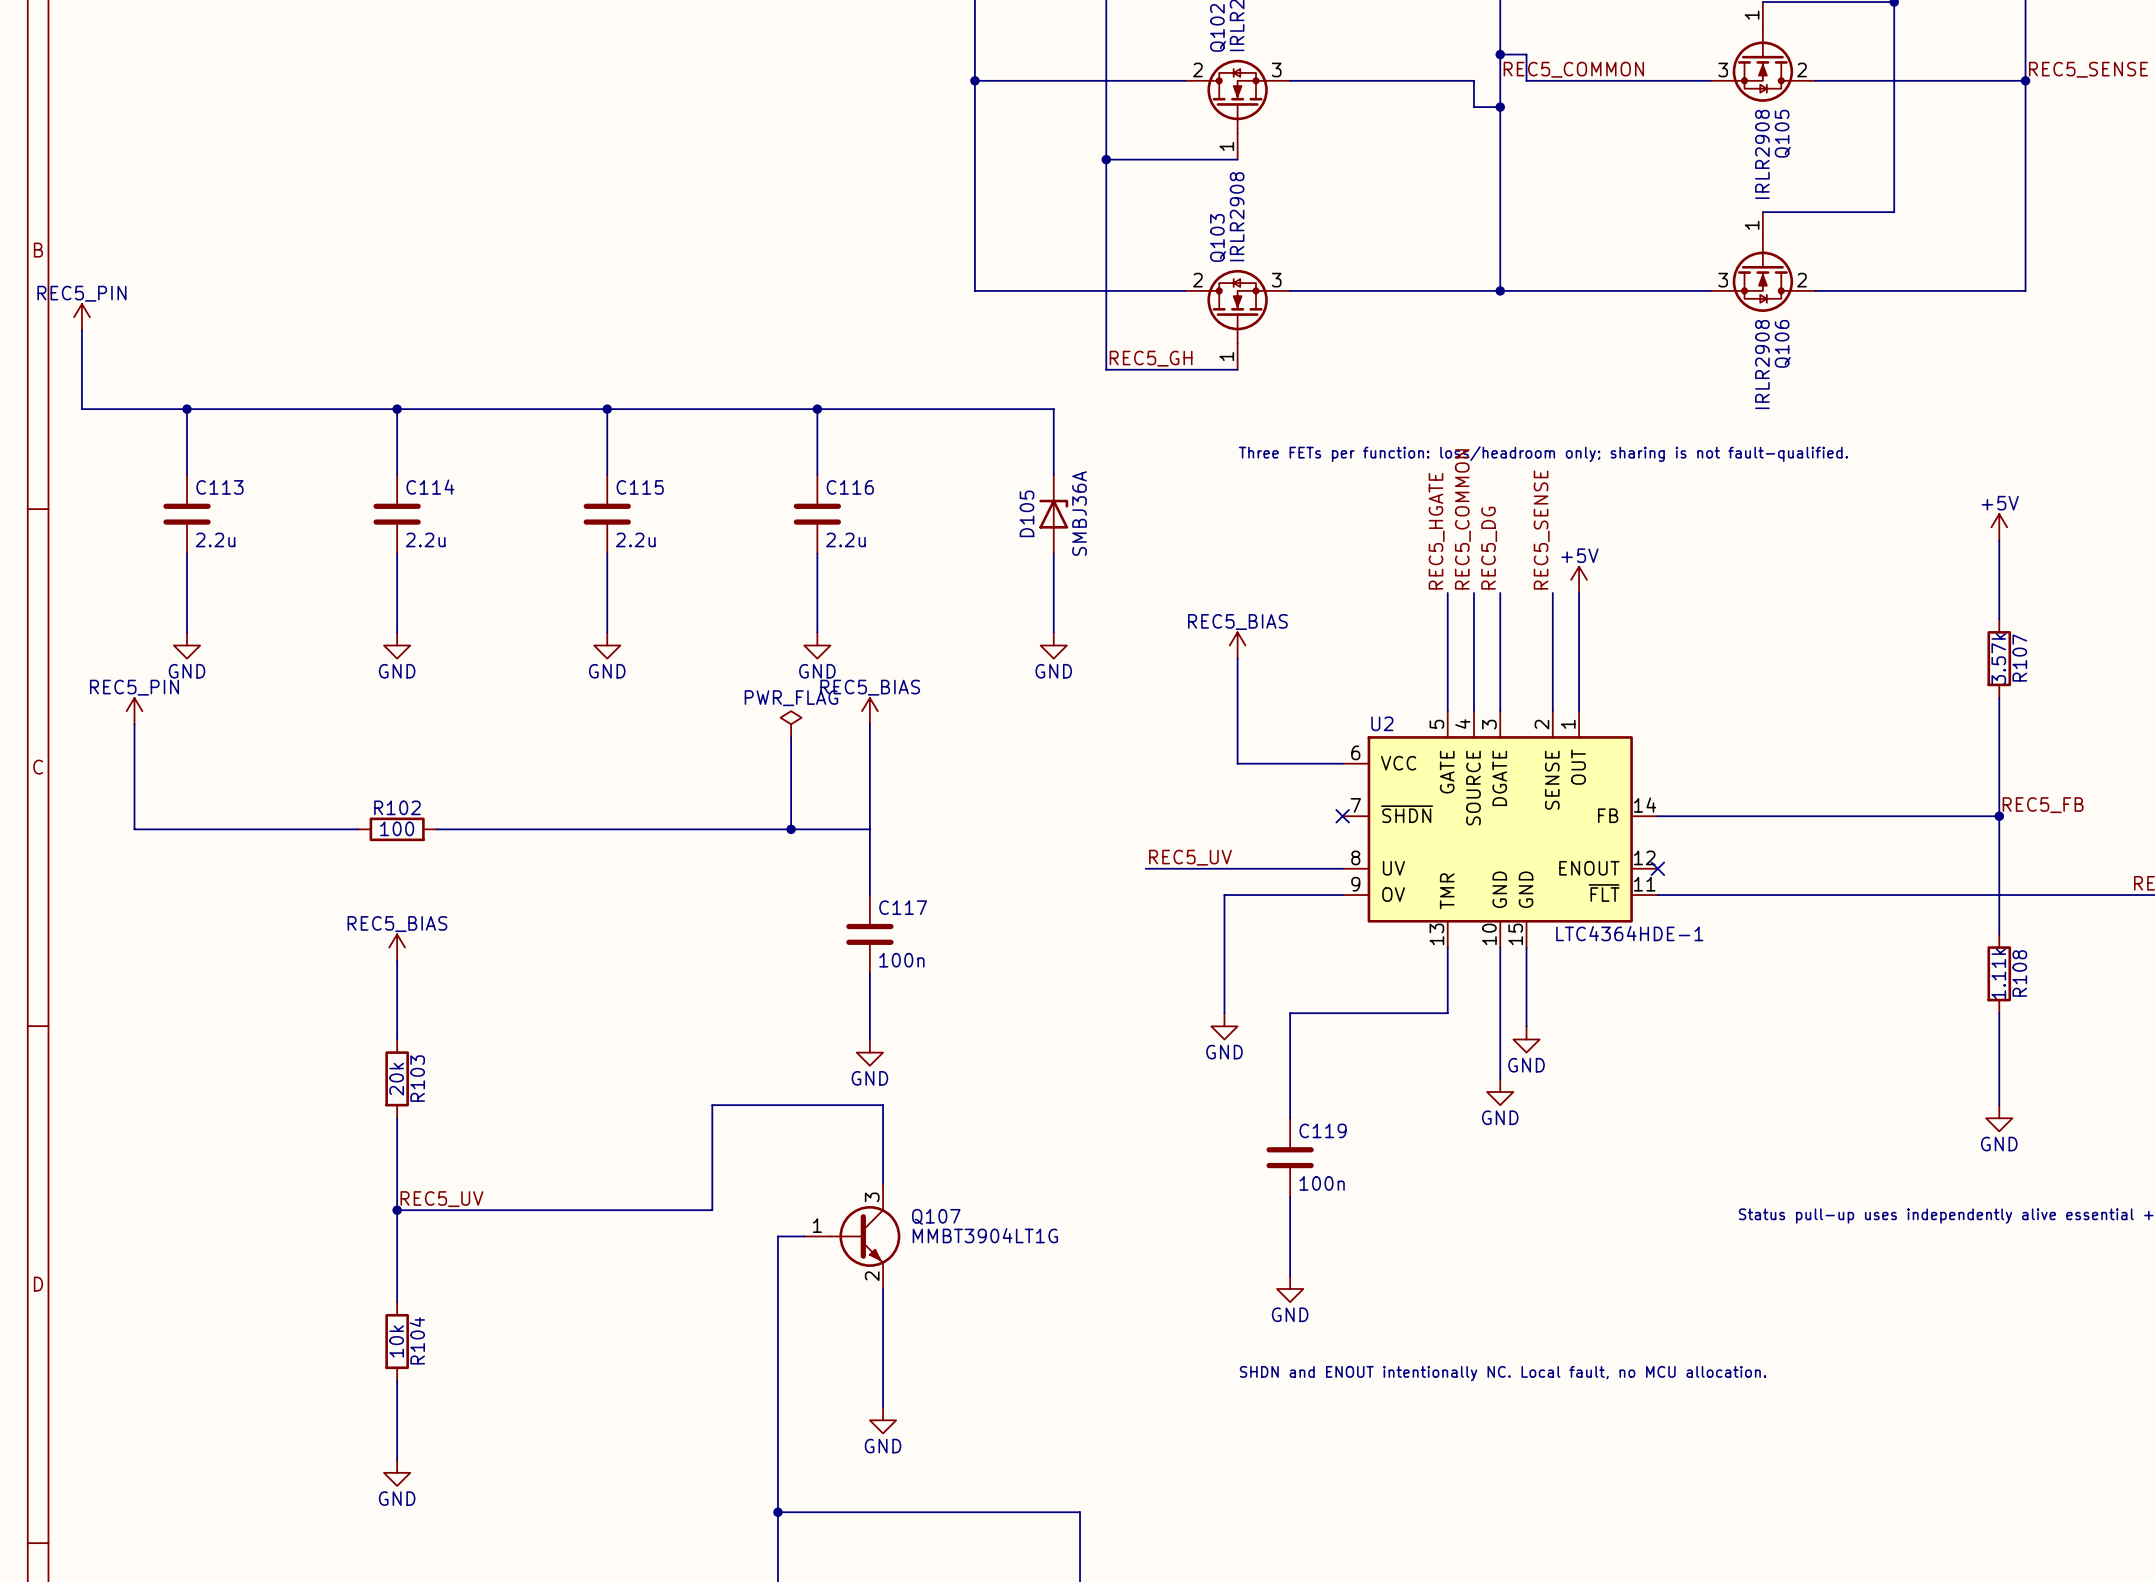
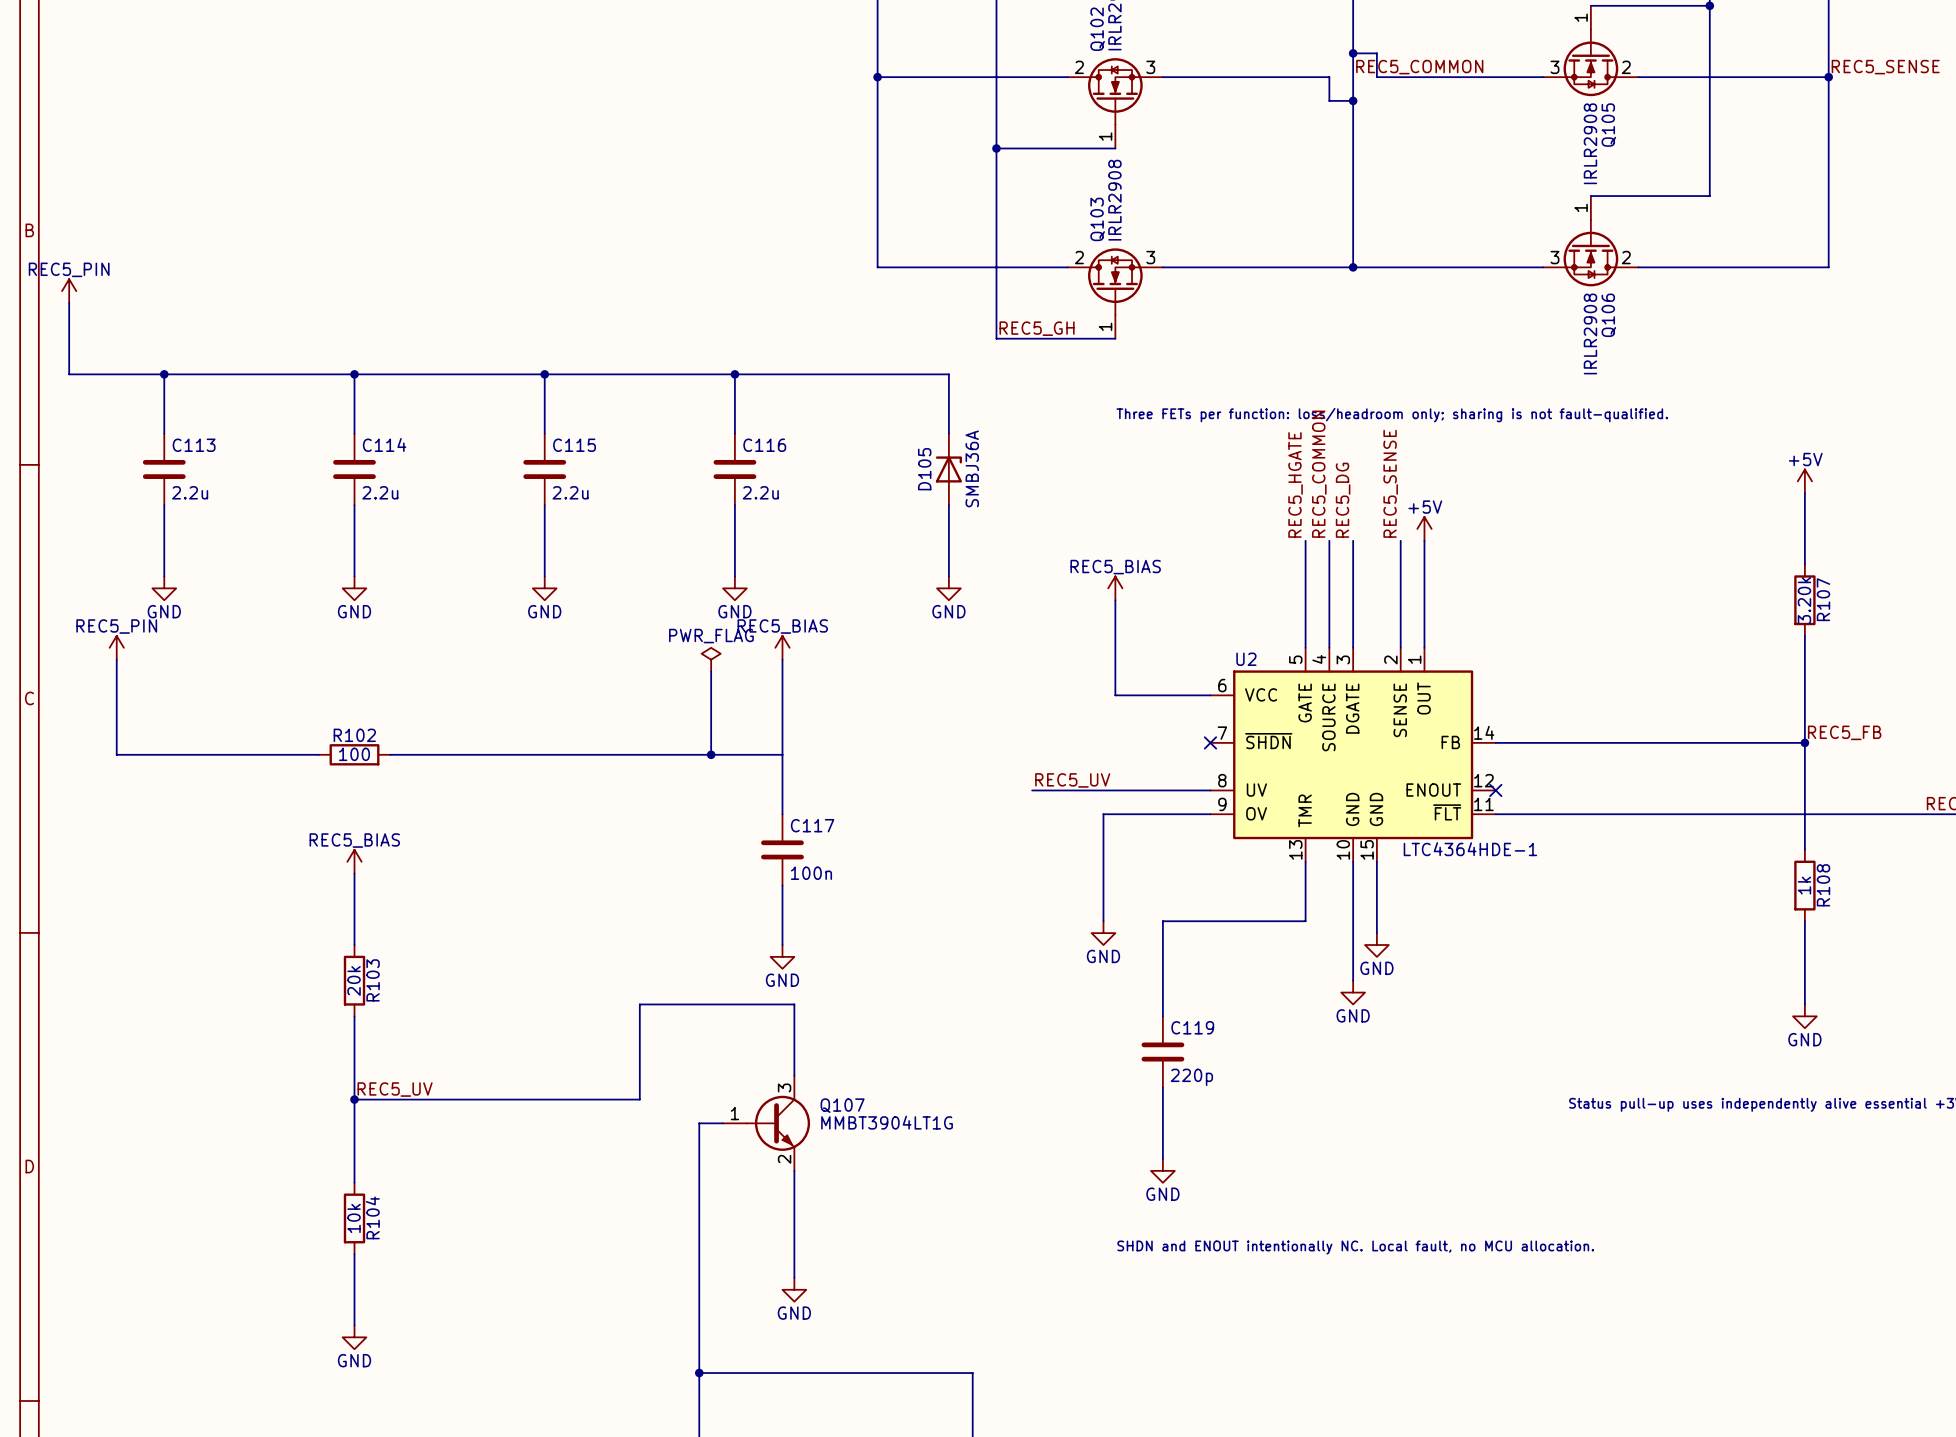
R107 value: 3.57k (1998, 658) -> 3.20k (1804, 600)
R108 value: 1.11k (1998, 973) -> 1k (1804, 885)
C119 value: 100n (1322, 1183) -> 220p (1191, 1077)

